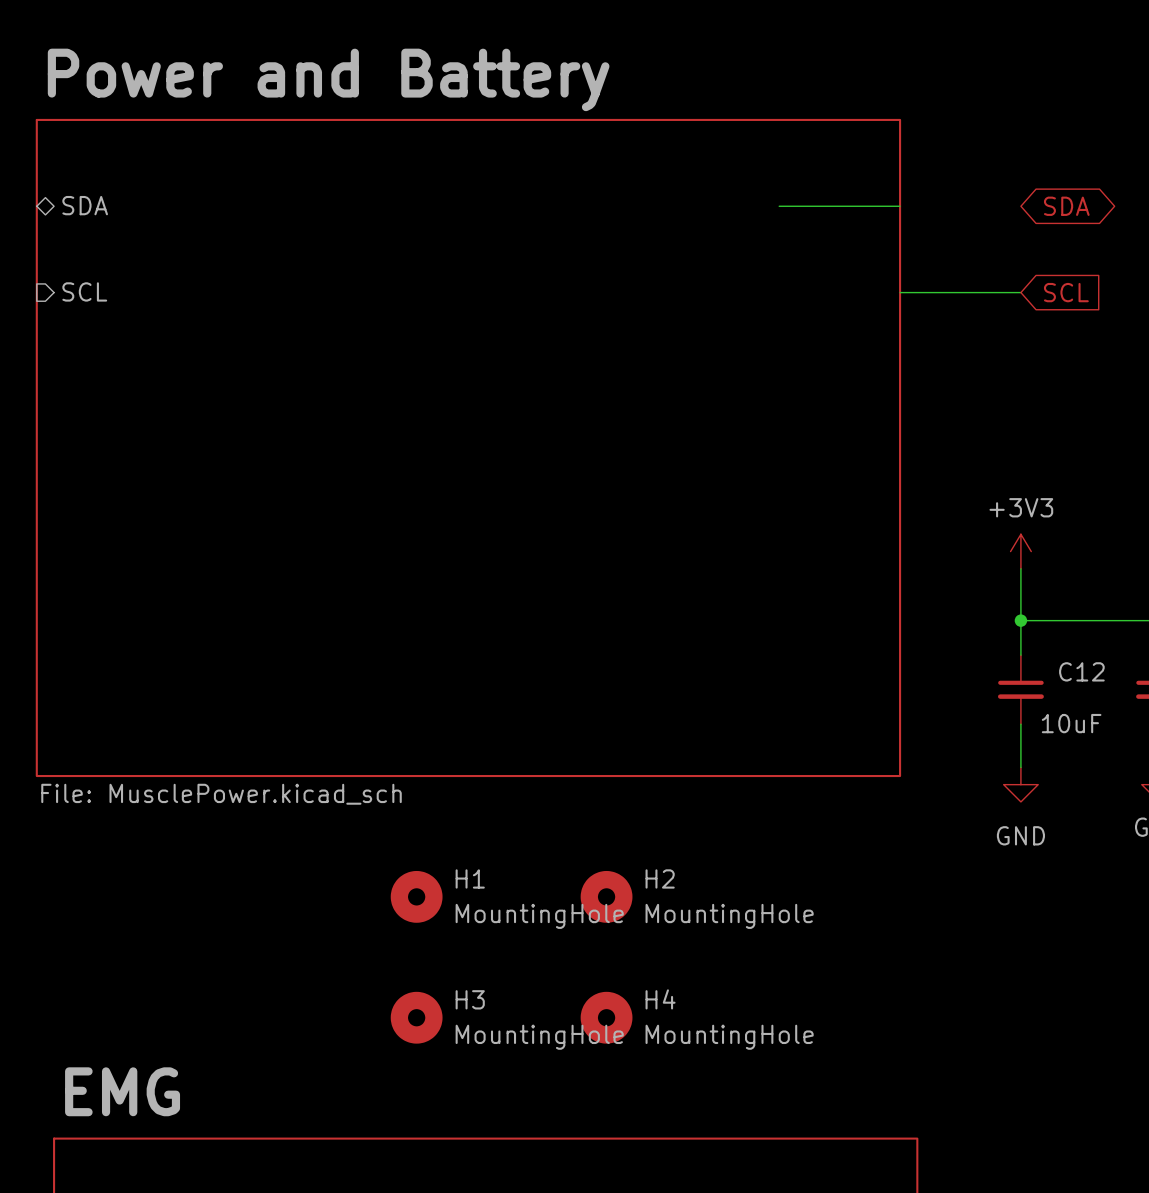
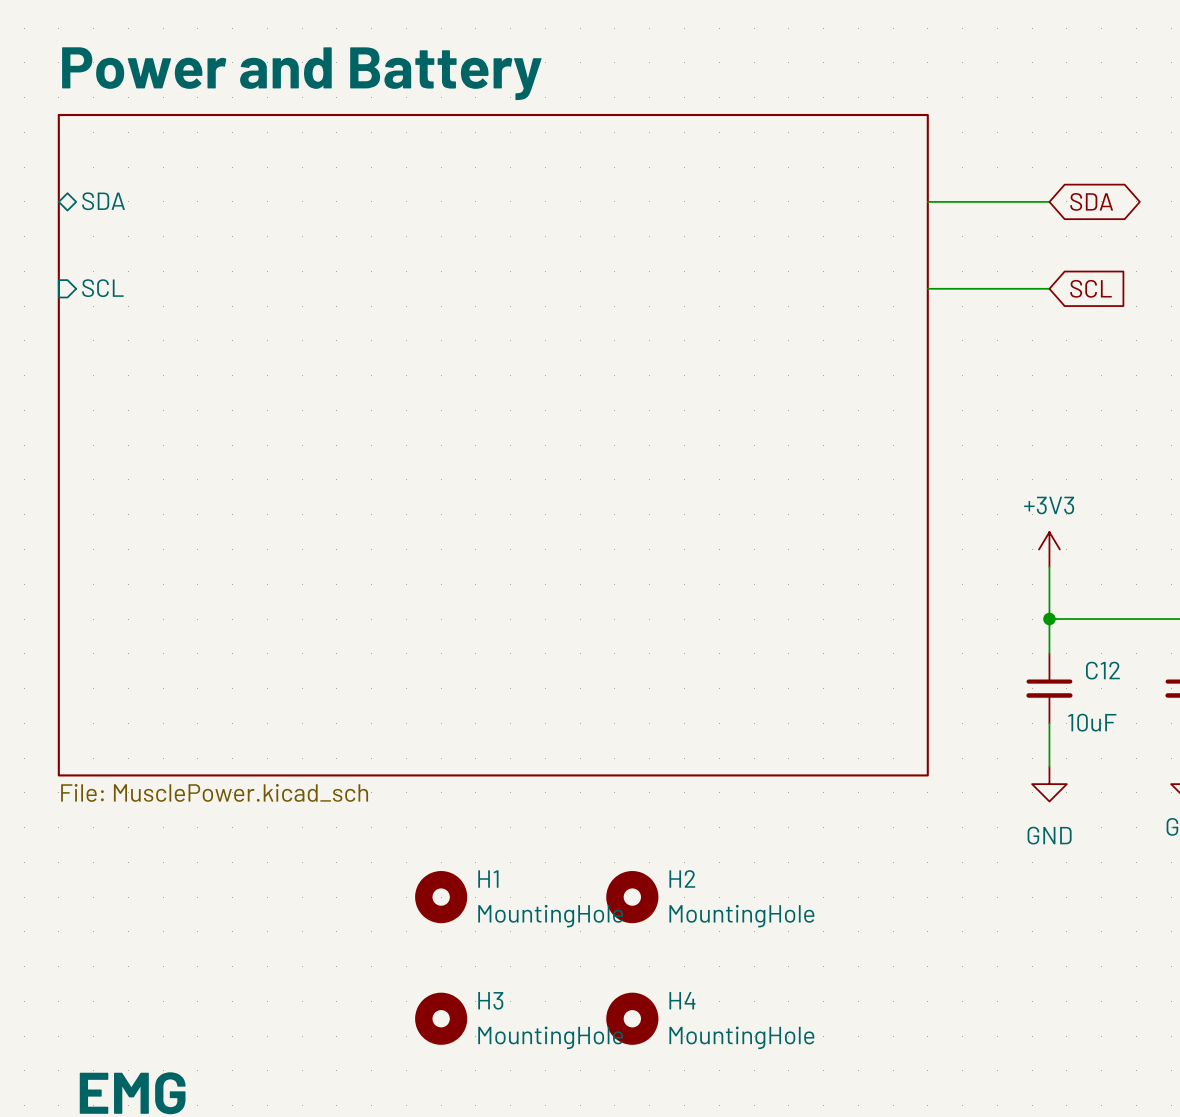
wire: (779, 206) (900, 206) -> (1049, 201) (927, 201)

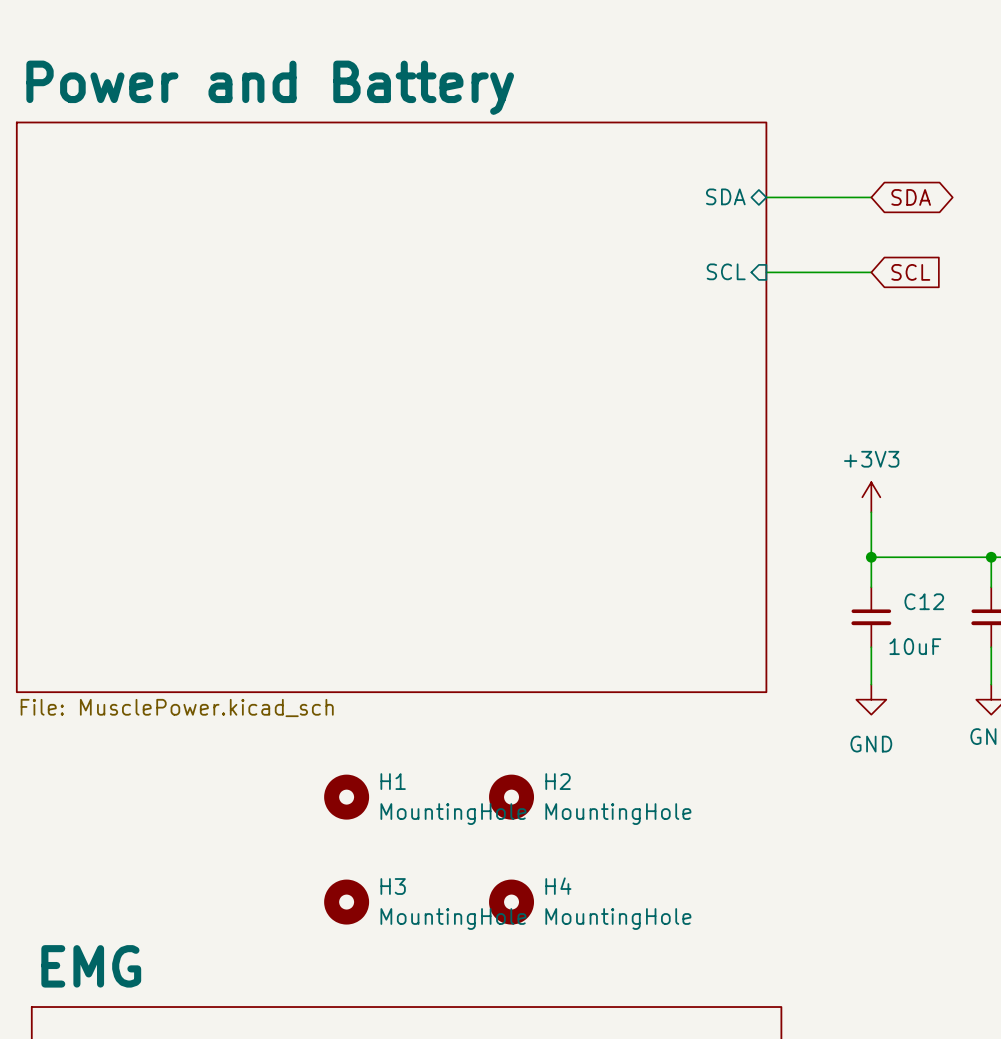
sheet pin: SDA (103, 201) -> none
sheet pin: none -> SDA (725, 196)
sheet pin: SCL (102, 288) -> none
sheet pin: none -> SCL (726, 271)

